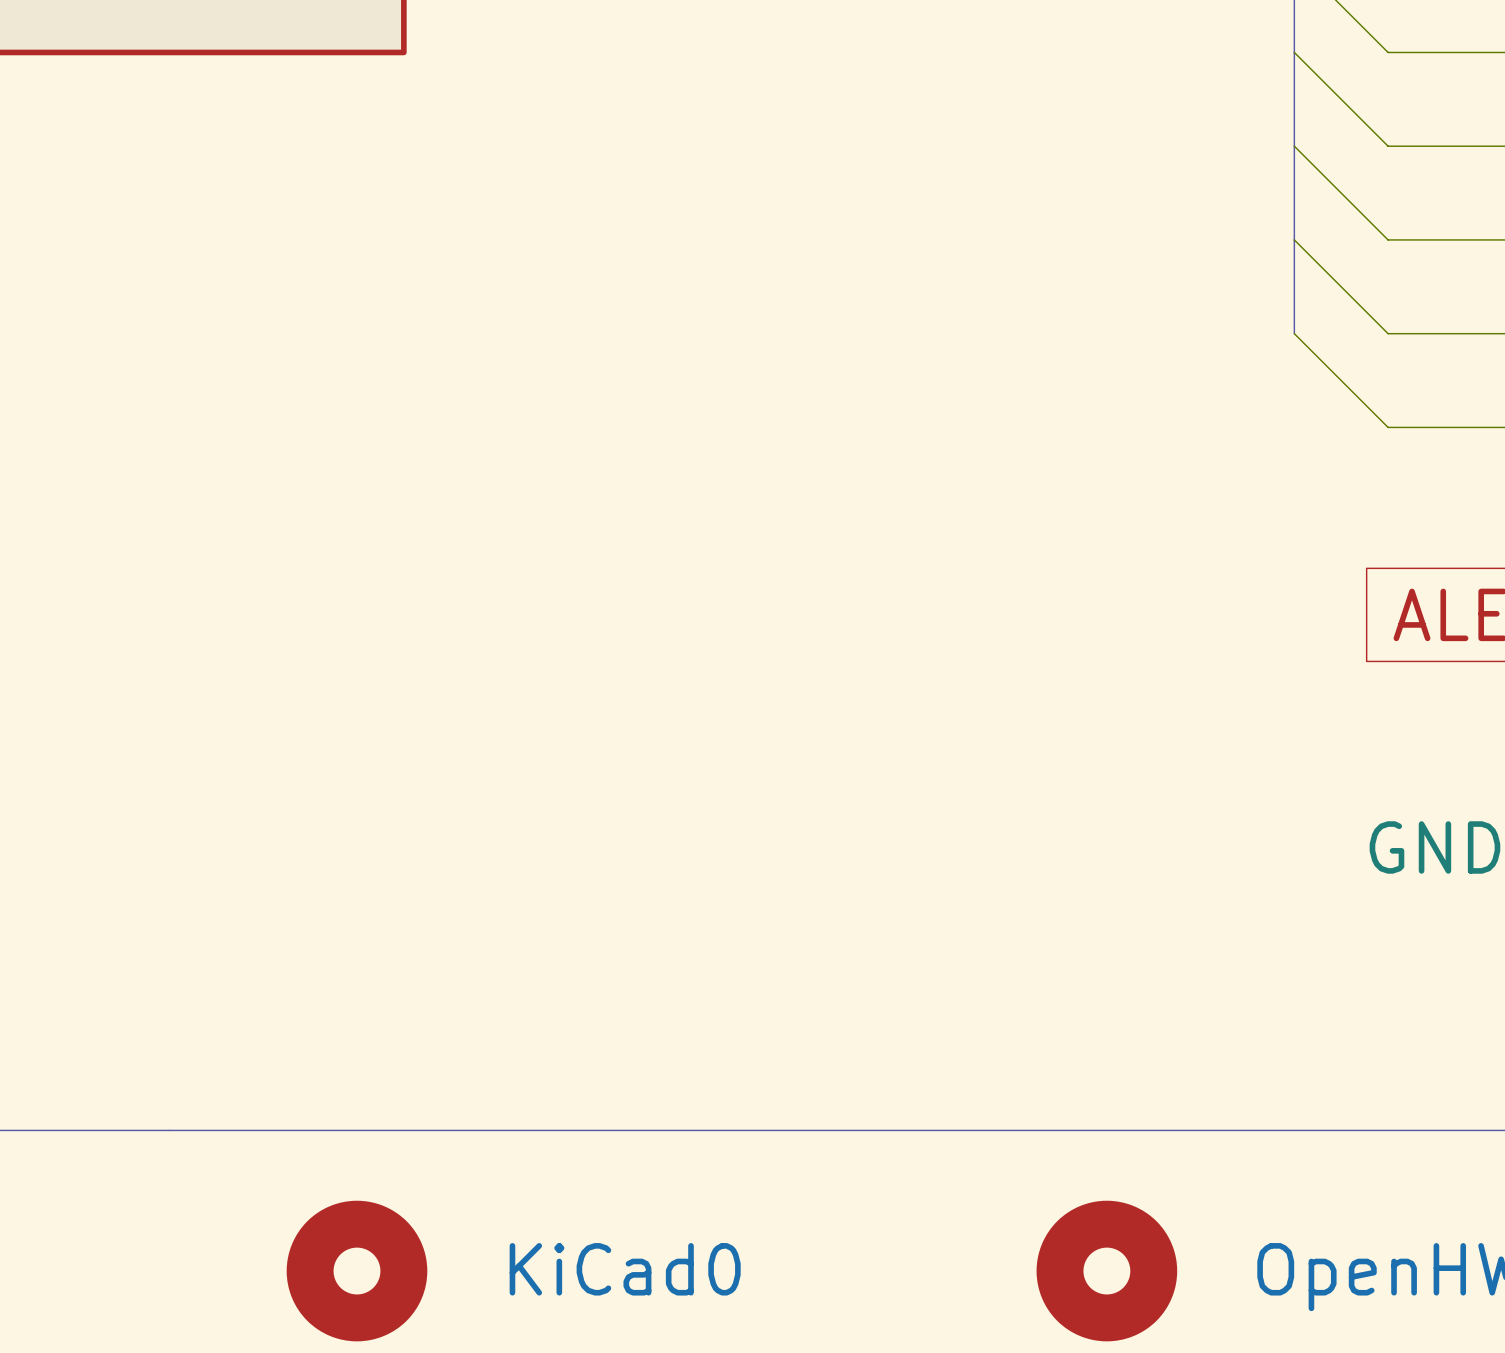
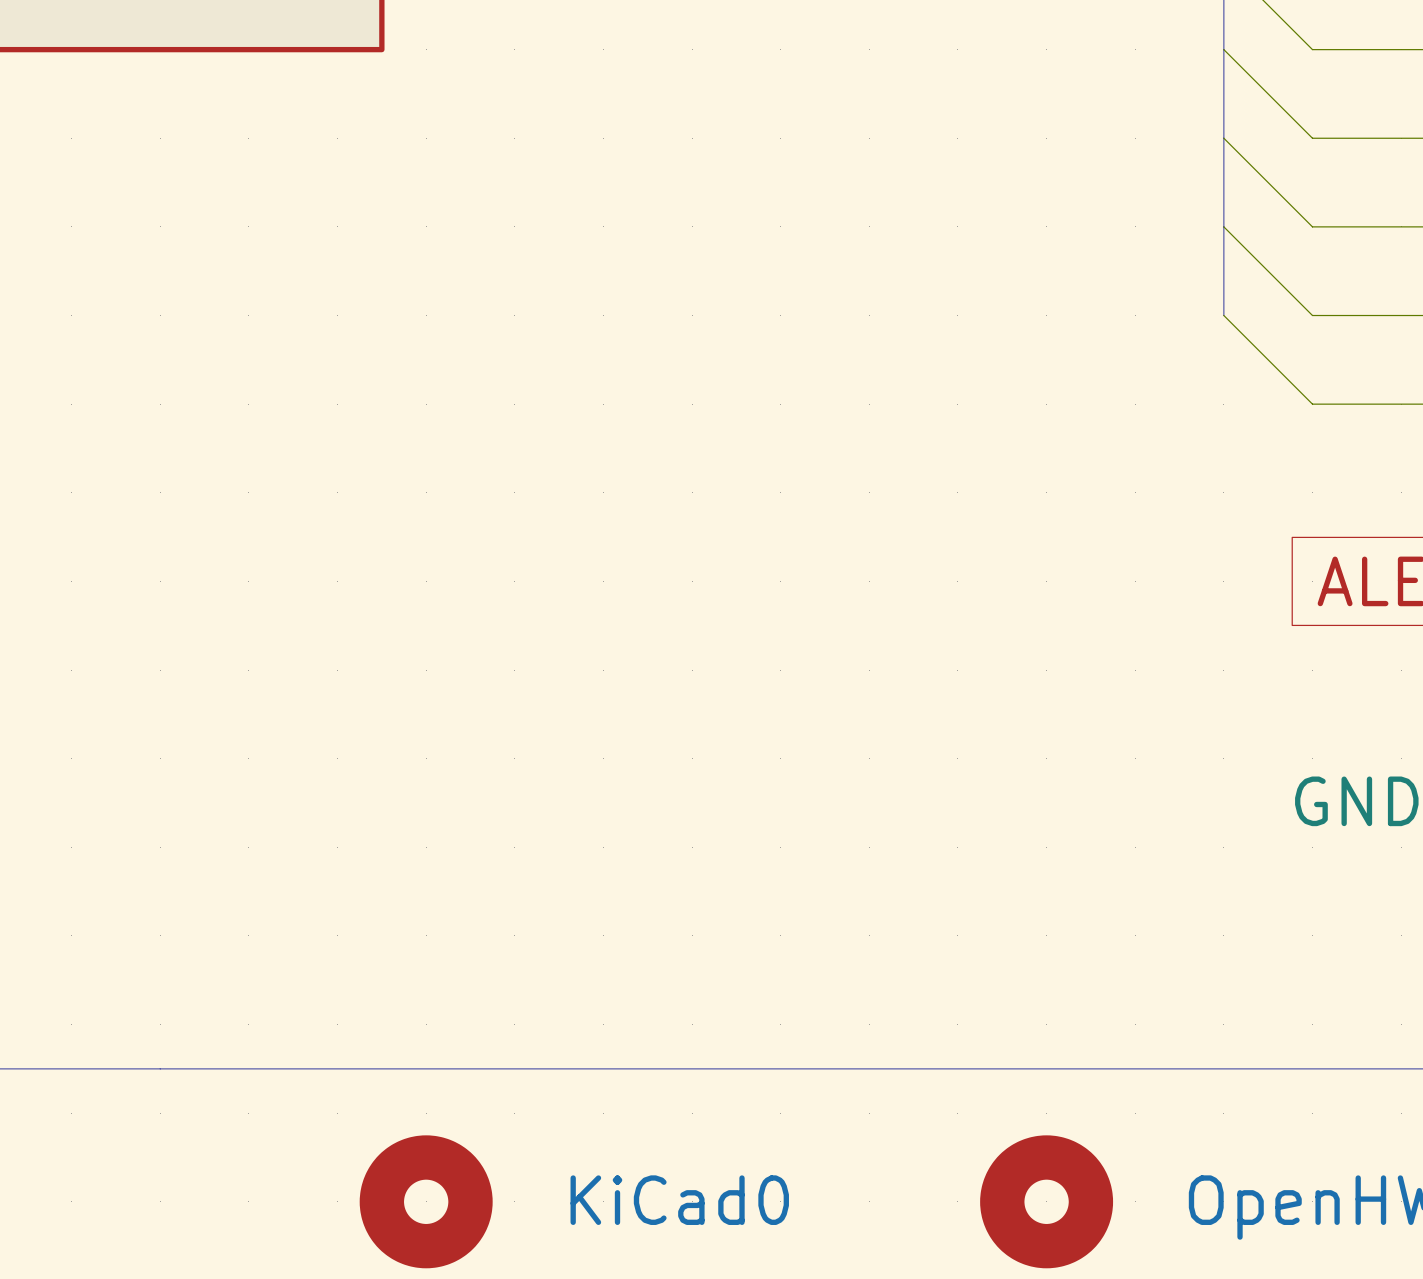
KiCad0 position: (356, 1271) -> (426, 1201)

